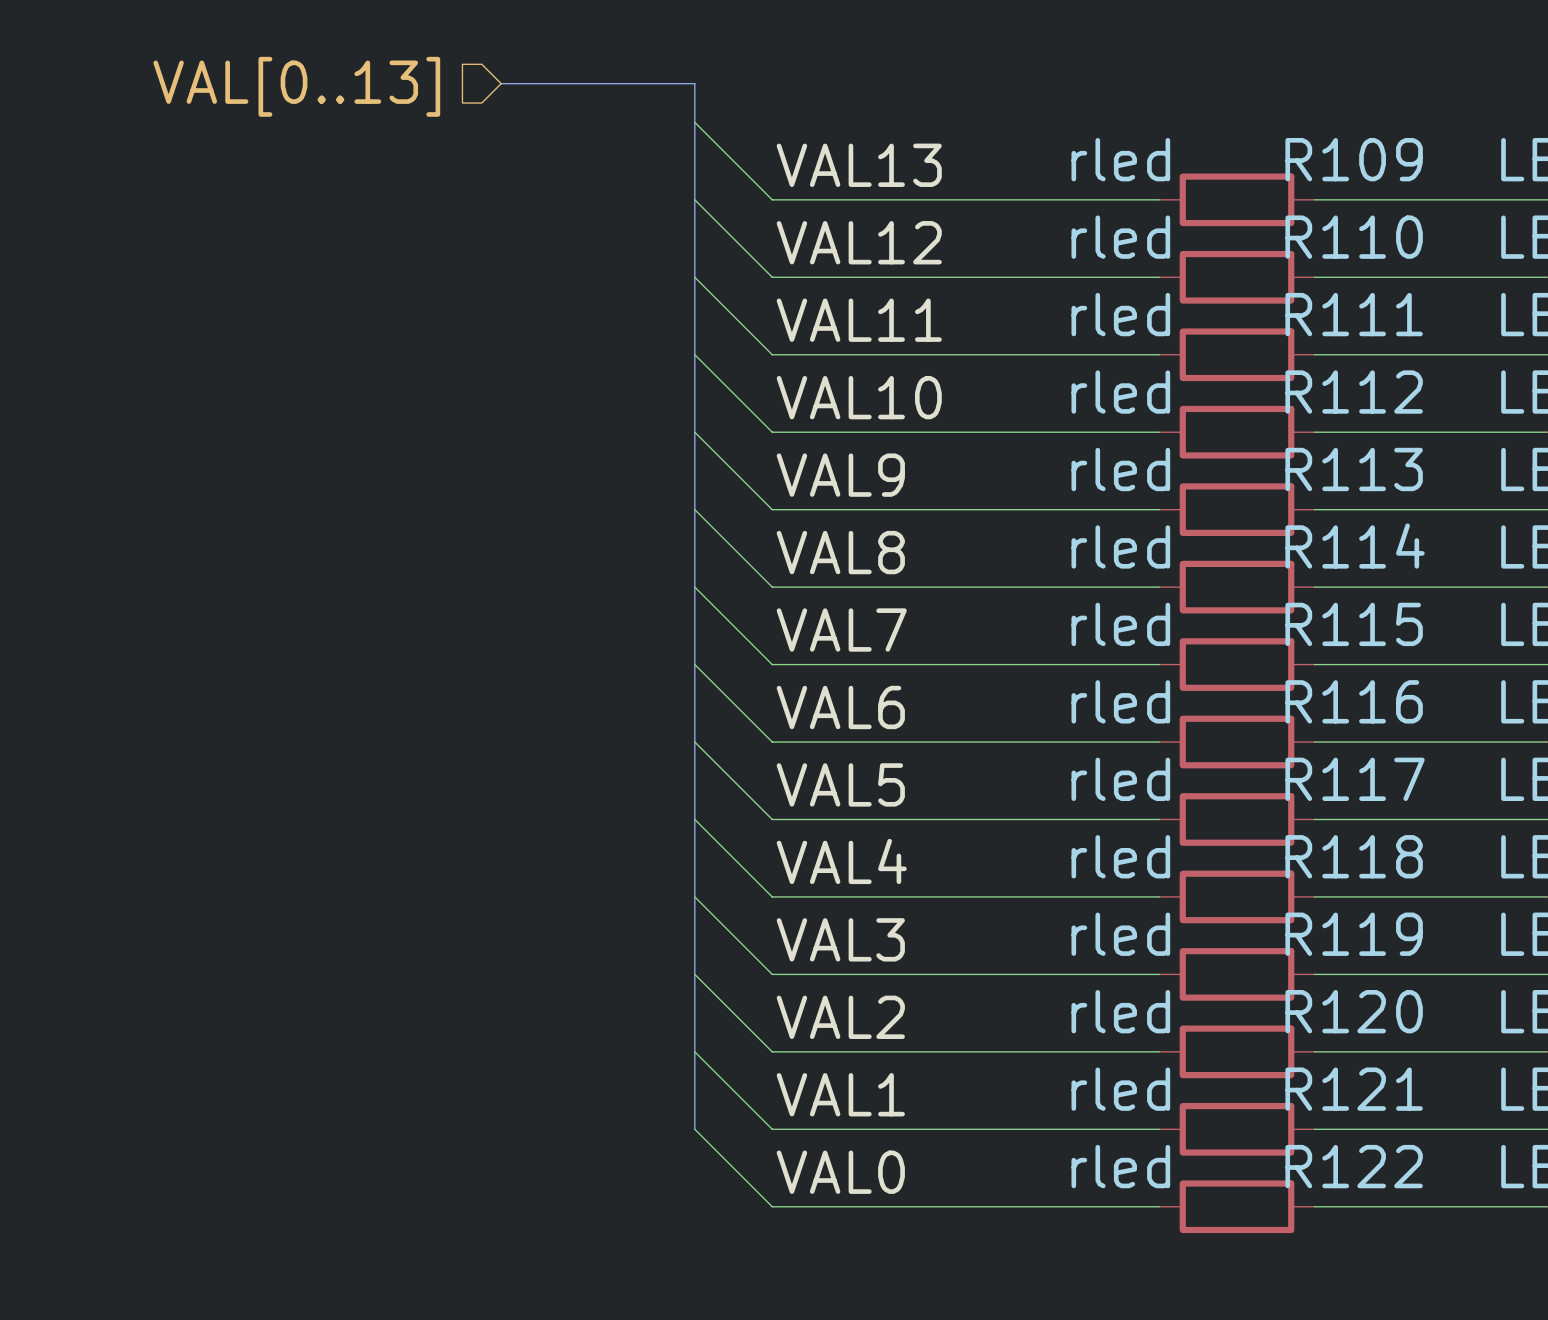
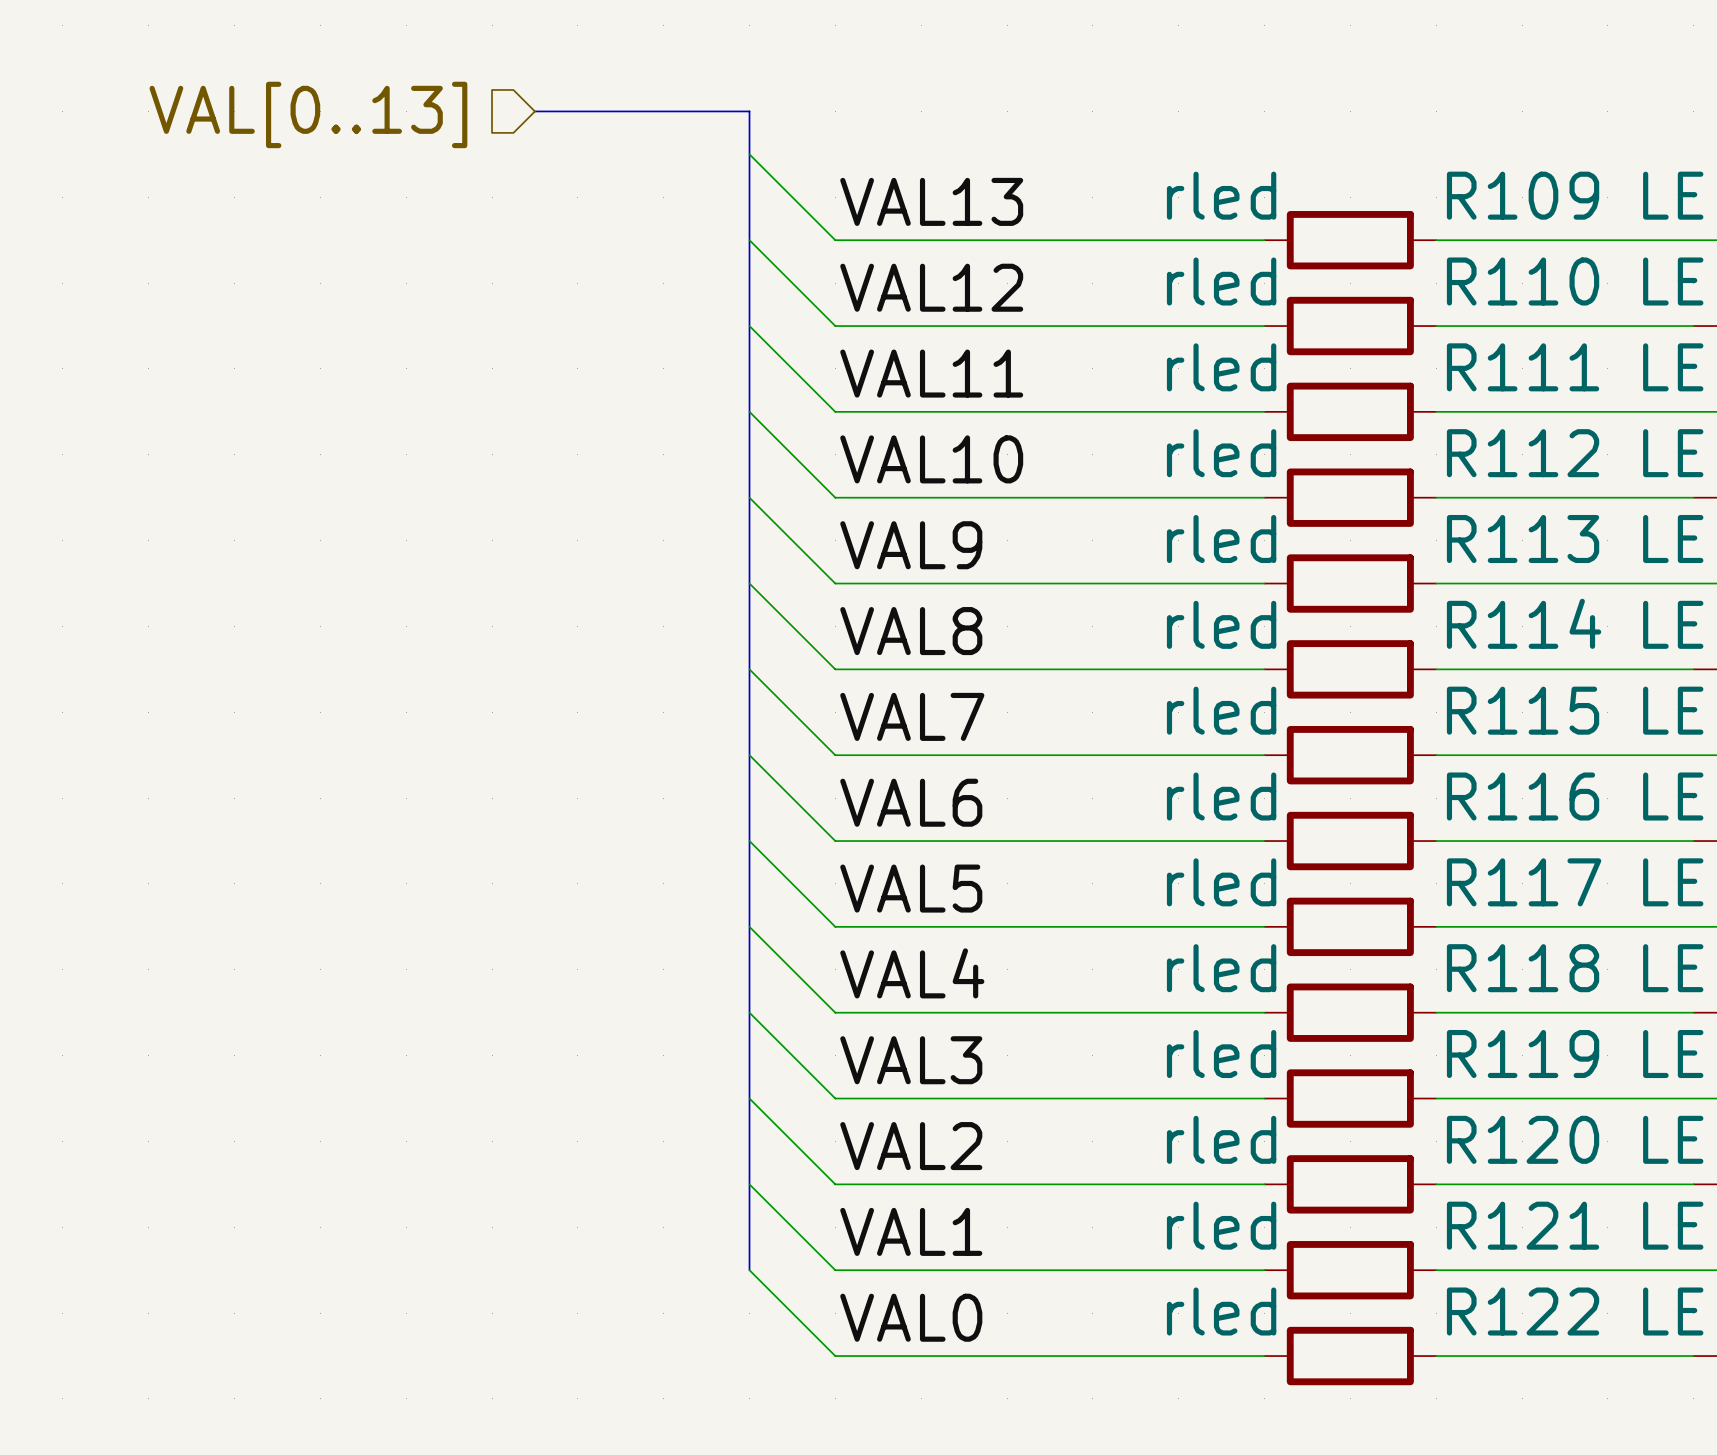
R109 name position: R109 (1354, 159) -> R109 (1523, 195)
R110 name position: R110 (1354, 237) -> R110 (1523, 281)
R111 name position: R111 (1354, 314) -> R111 (1523, 367)
R112 name position: R112 (1354, 392) -> R112 (1523, 453)
R113 name position: R113 (1354, 469) -> R113 (1523, 539)
R114 name position: R114 (1355, 546) -> R114 (1524, 623)
R115 name position: R115 (1354, 624) -> R115 (1523, 710)
R116 name position: R116 (1354, 701) -> R116 (1523, 796)
R117 name position: R117 (1355, 779) -> R117 (1524, 882)
R118 name position: R118 (1354, 856) -> R118 (1523, 968)
R119 name position: R119 (1354, 934) -> R119 (1523, 1054)
R120 name position: R120 (1354, 1011) -> R120 (1523, 1139)
R121 name position: R121 (1354, 1089) -> R121 (1523, 1225)
R122 name position: R122 (1354, 1166) -> R122 (1523, 1311)

